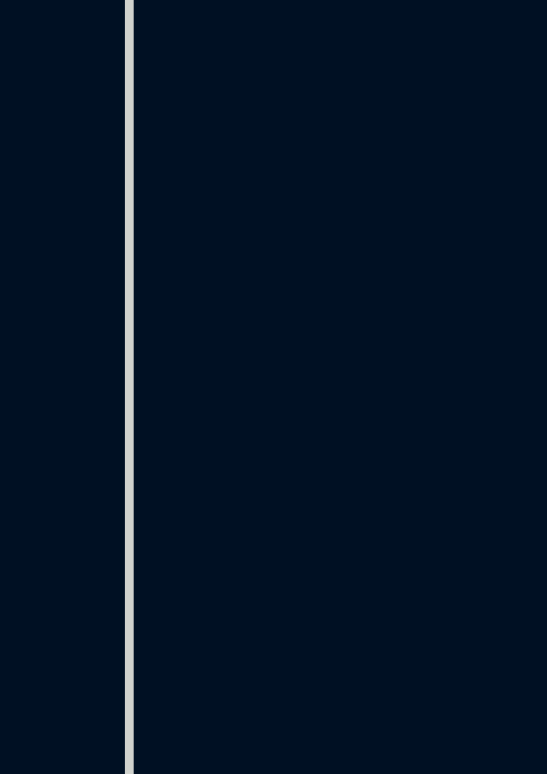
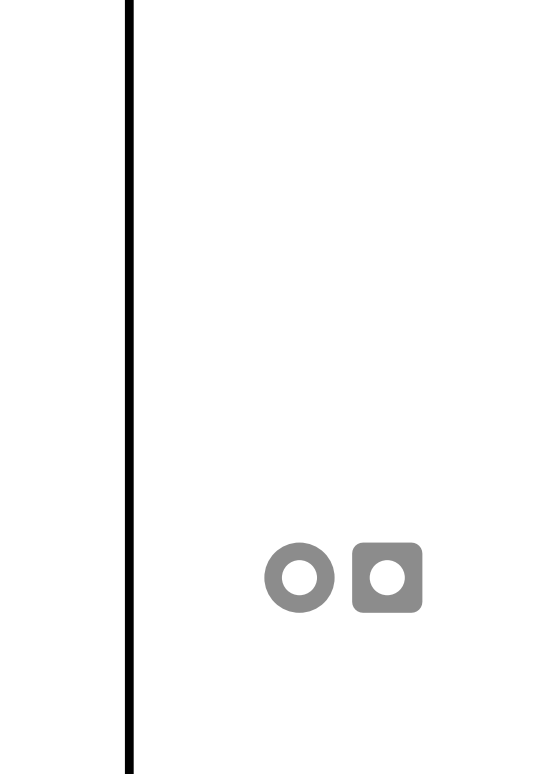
part: none -> (343, 577)

